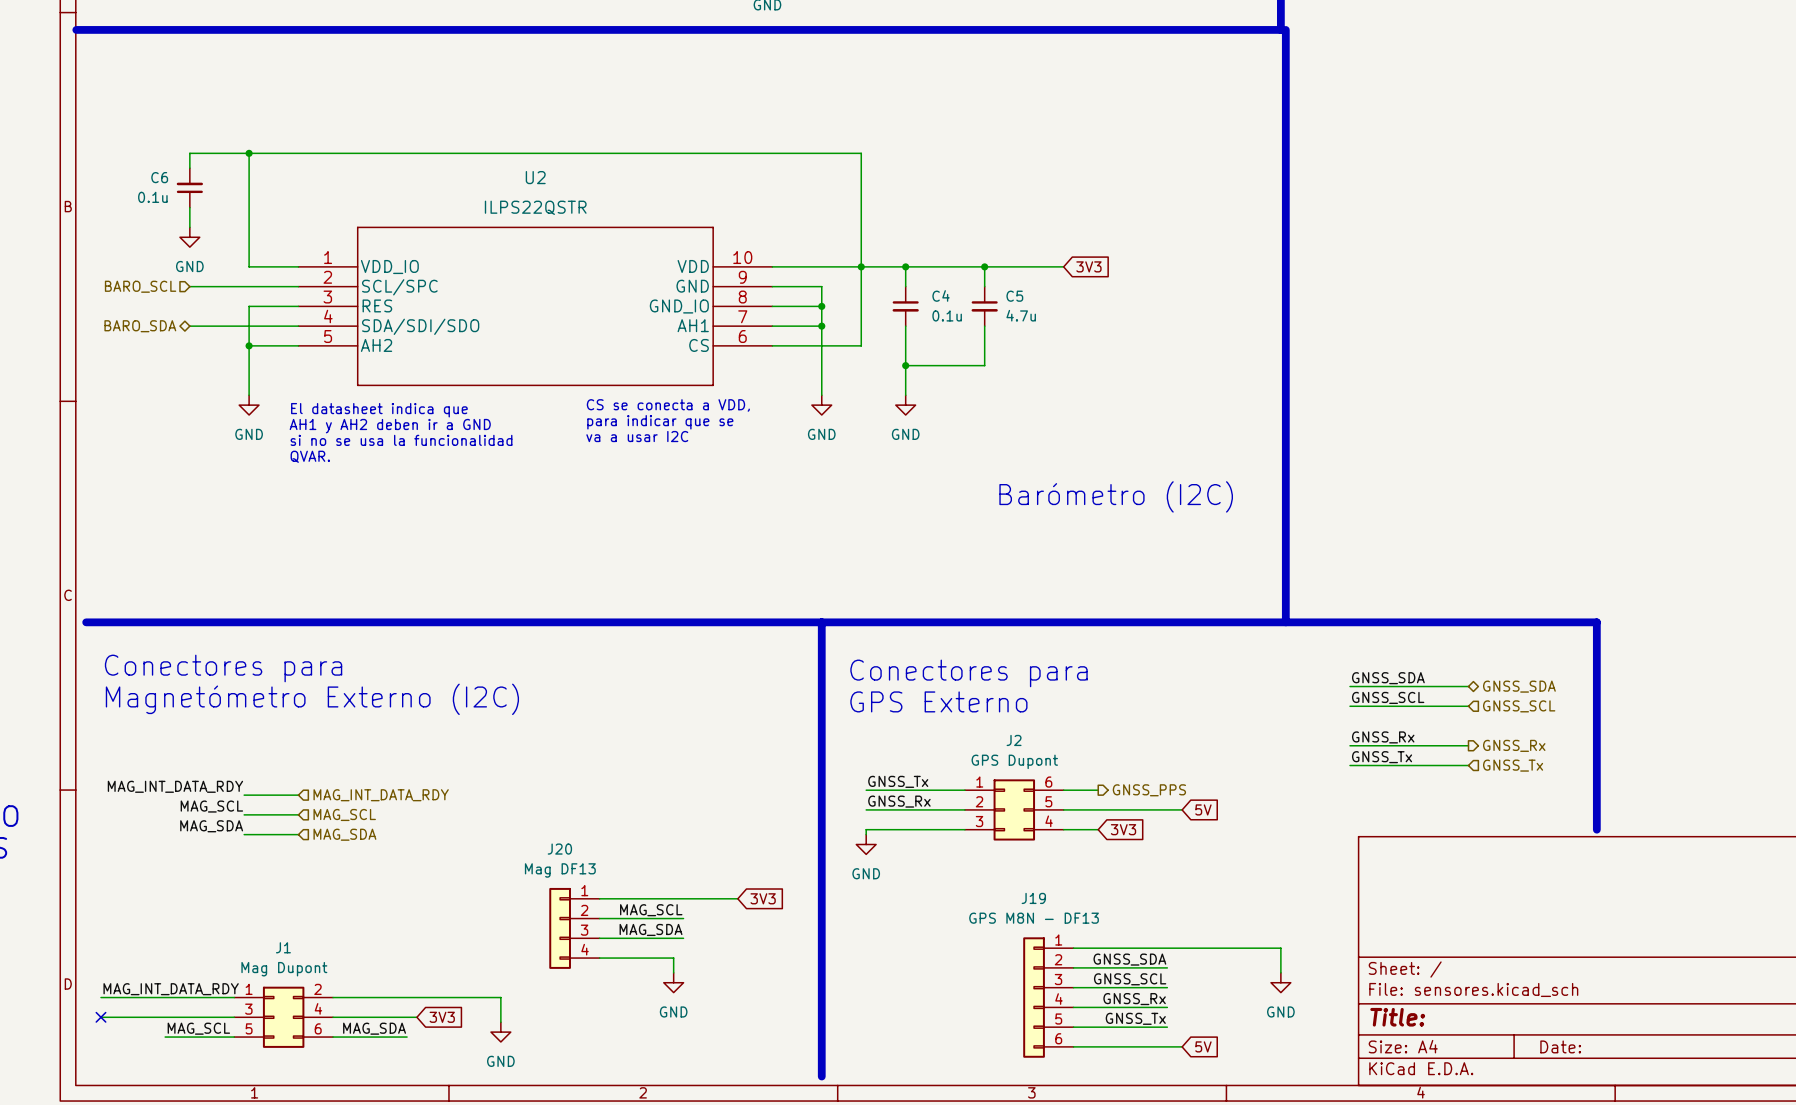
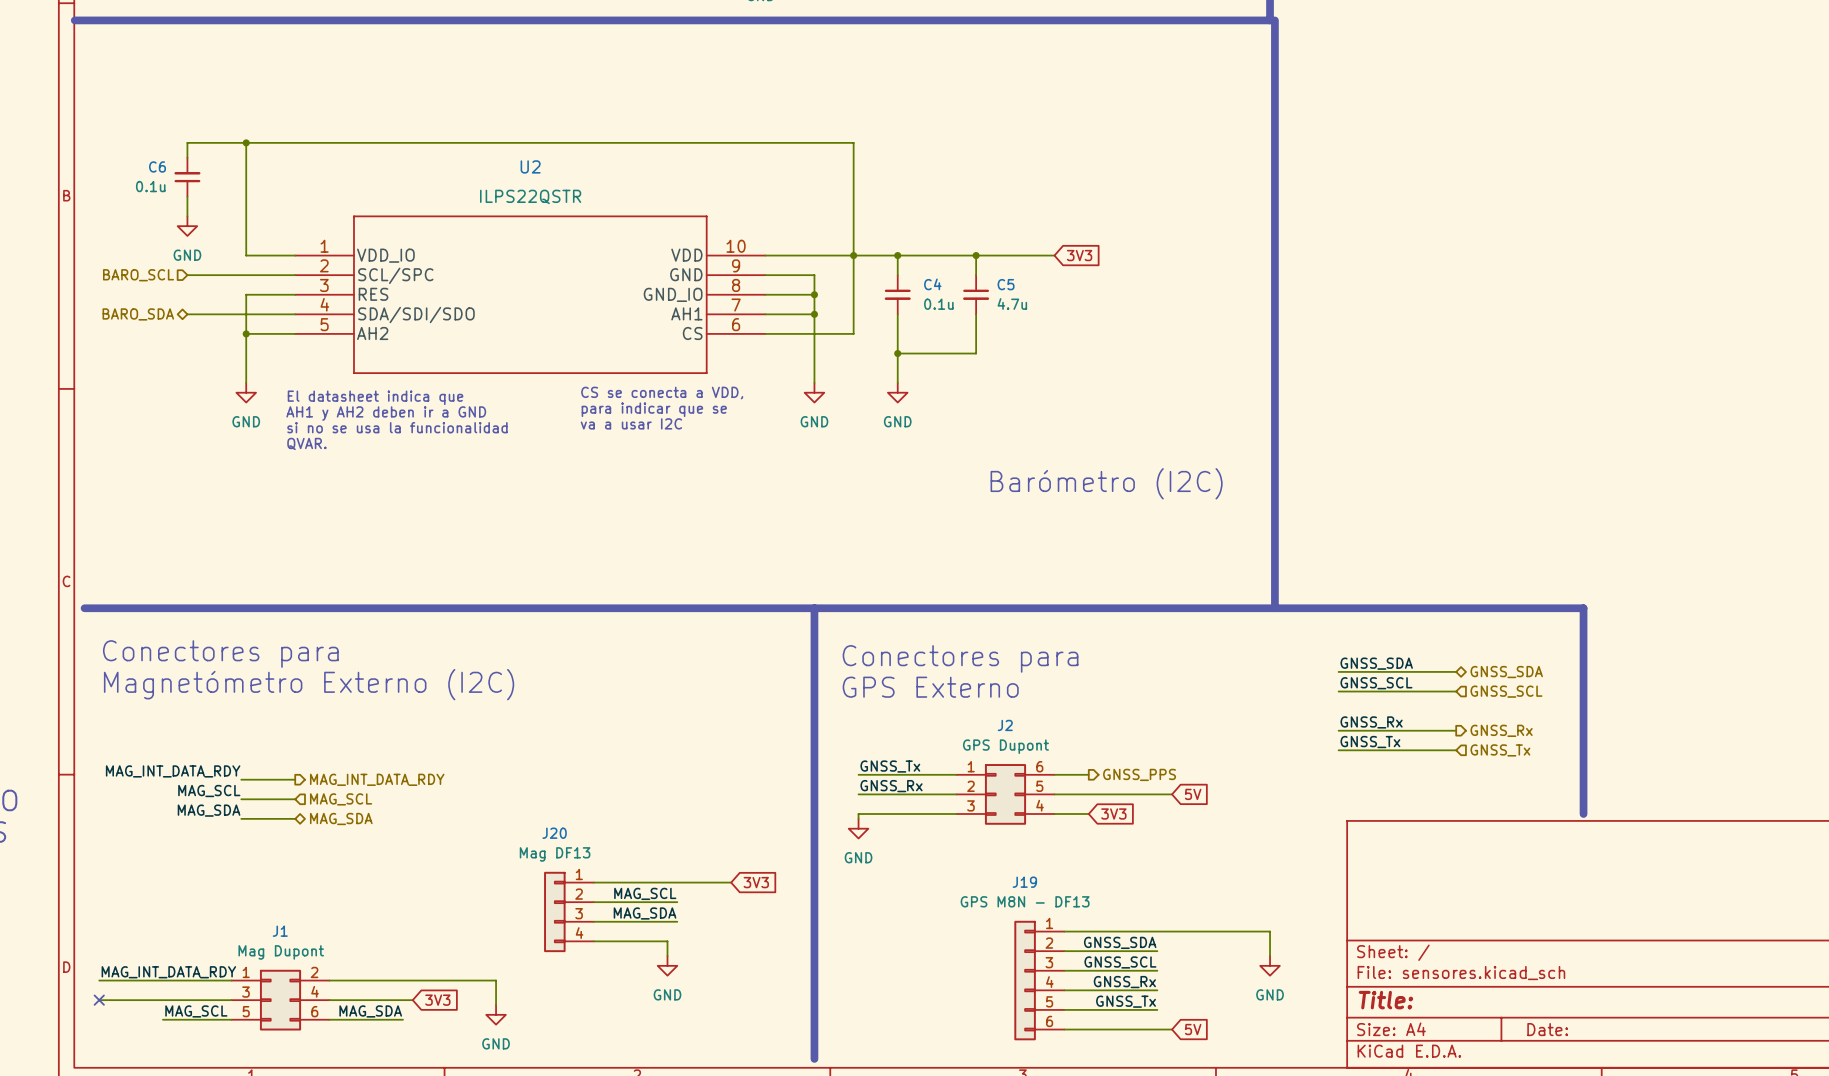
hierarchical label shape: input (381, 795) -> output (377, 779)
hierarchical label shape: input (344, 834) -> bidirectional (341, 818)

